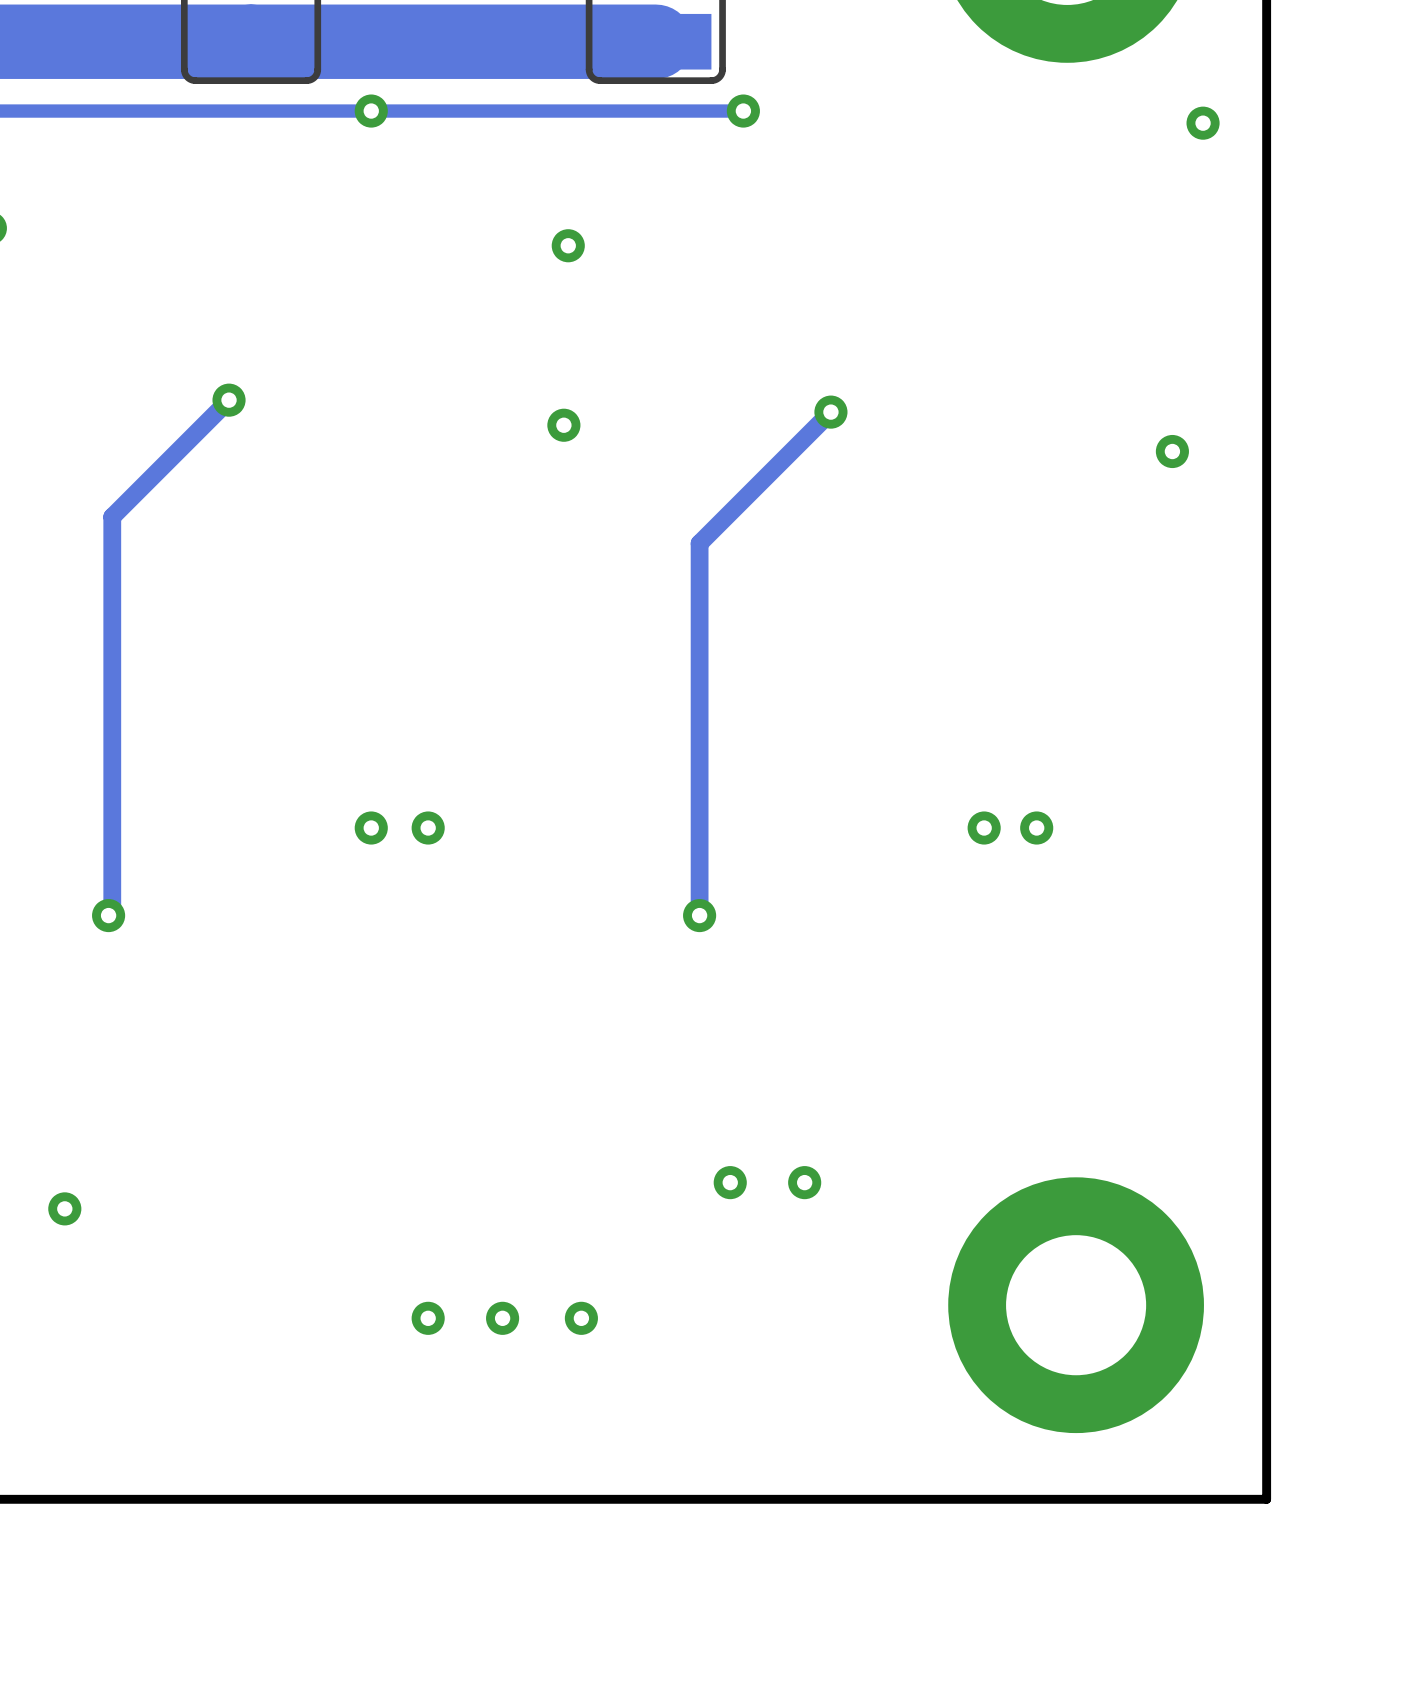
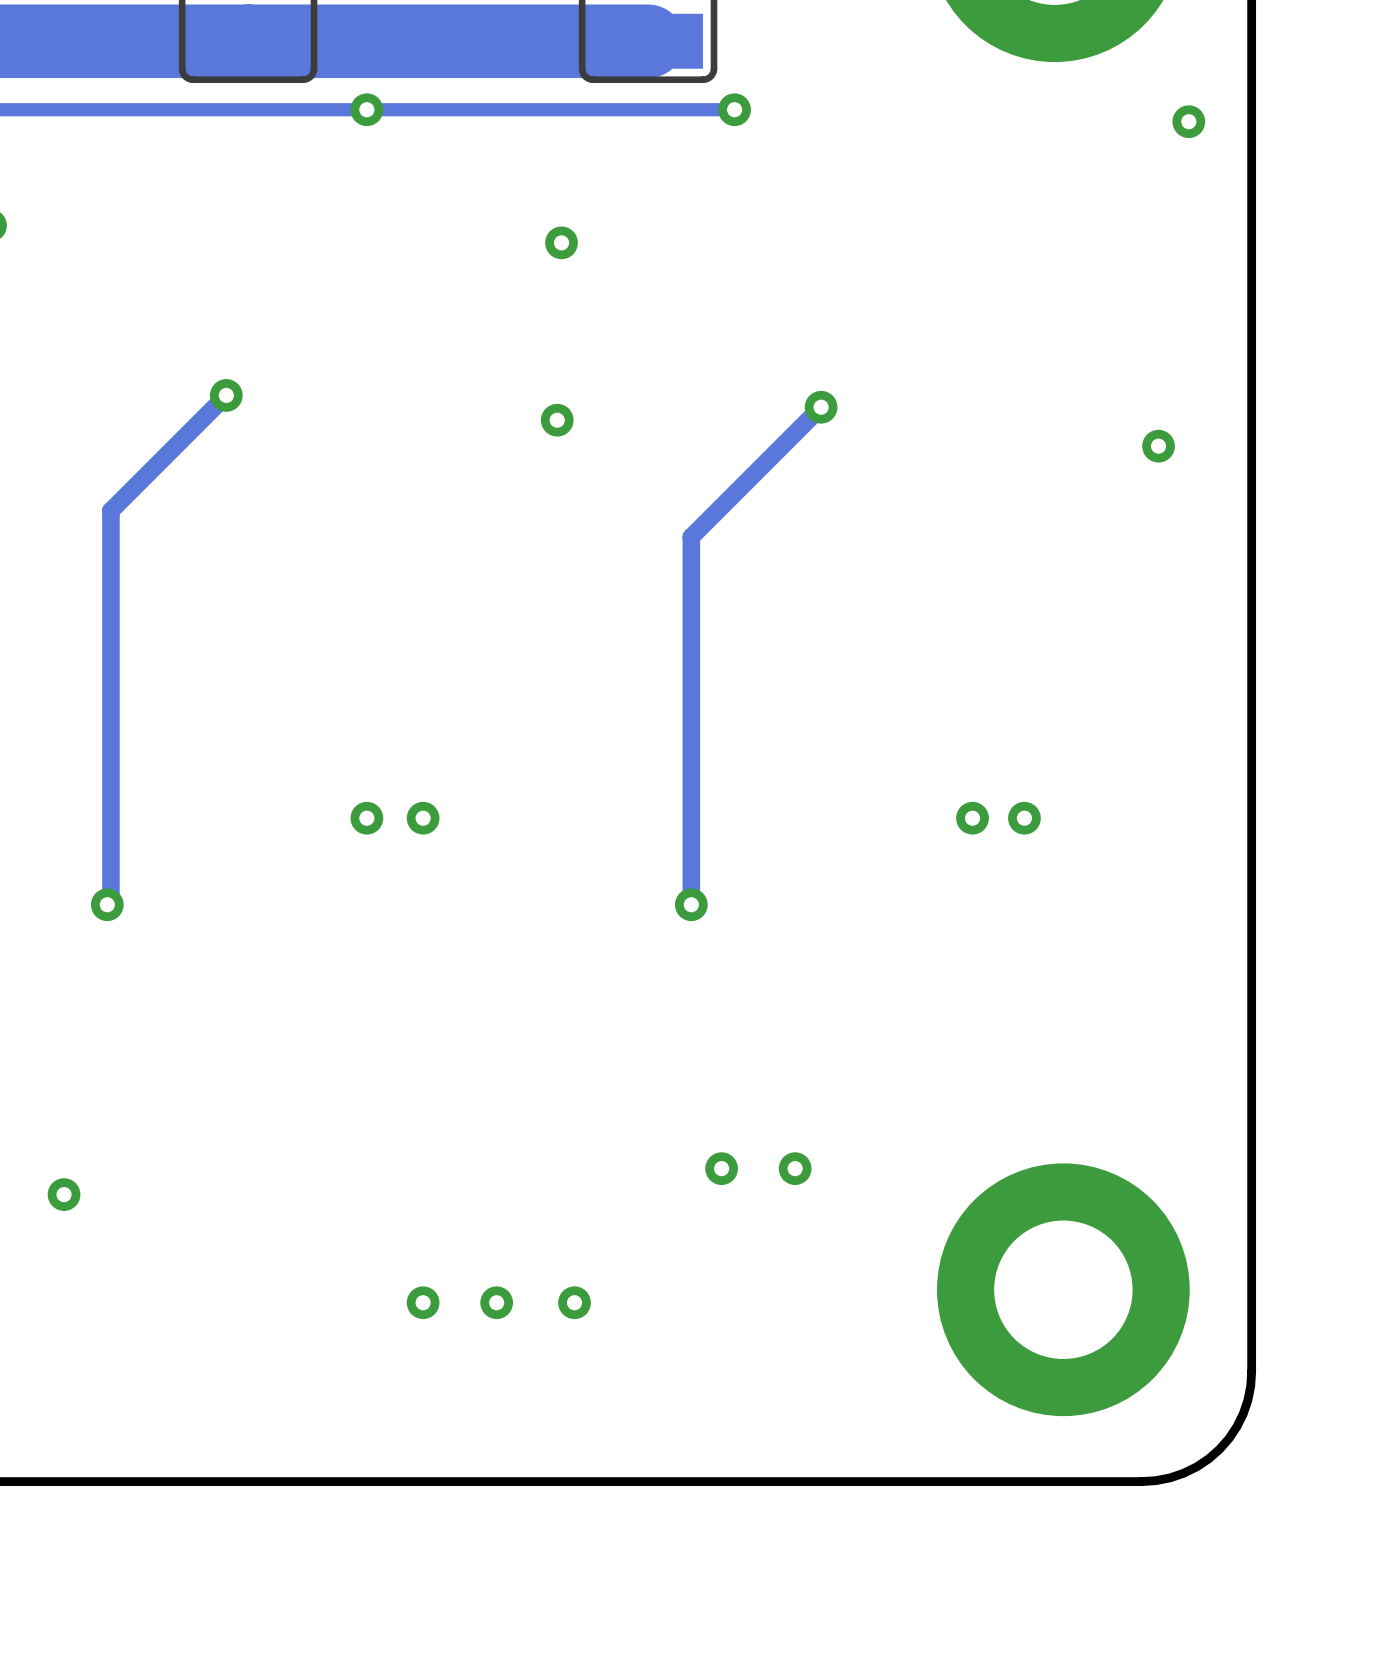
board edge: (1266, 1388) (1266, 1499) (1155, 1499) -> (1251, 1371) (1247, 1400) (1243, 1413) (1228, 1438) (1219, 1449) (1208, 1458) (1183, 1473) (1156, 1480) (1141, 1481)

